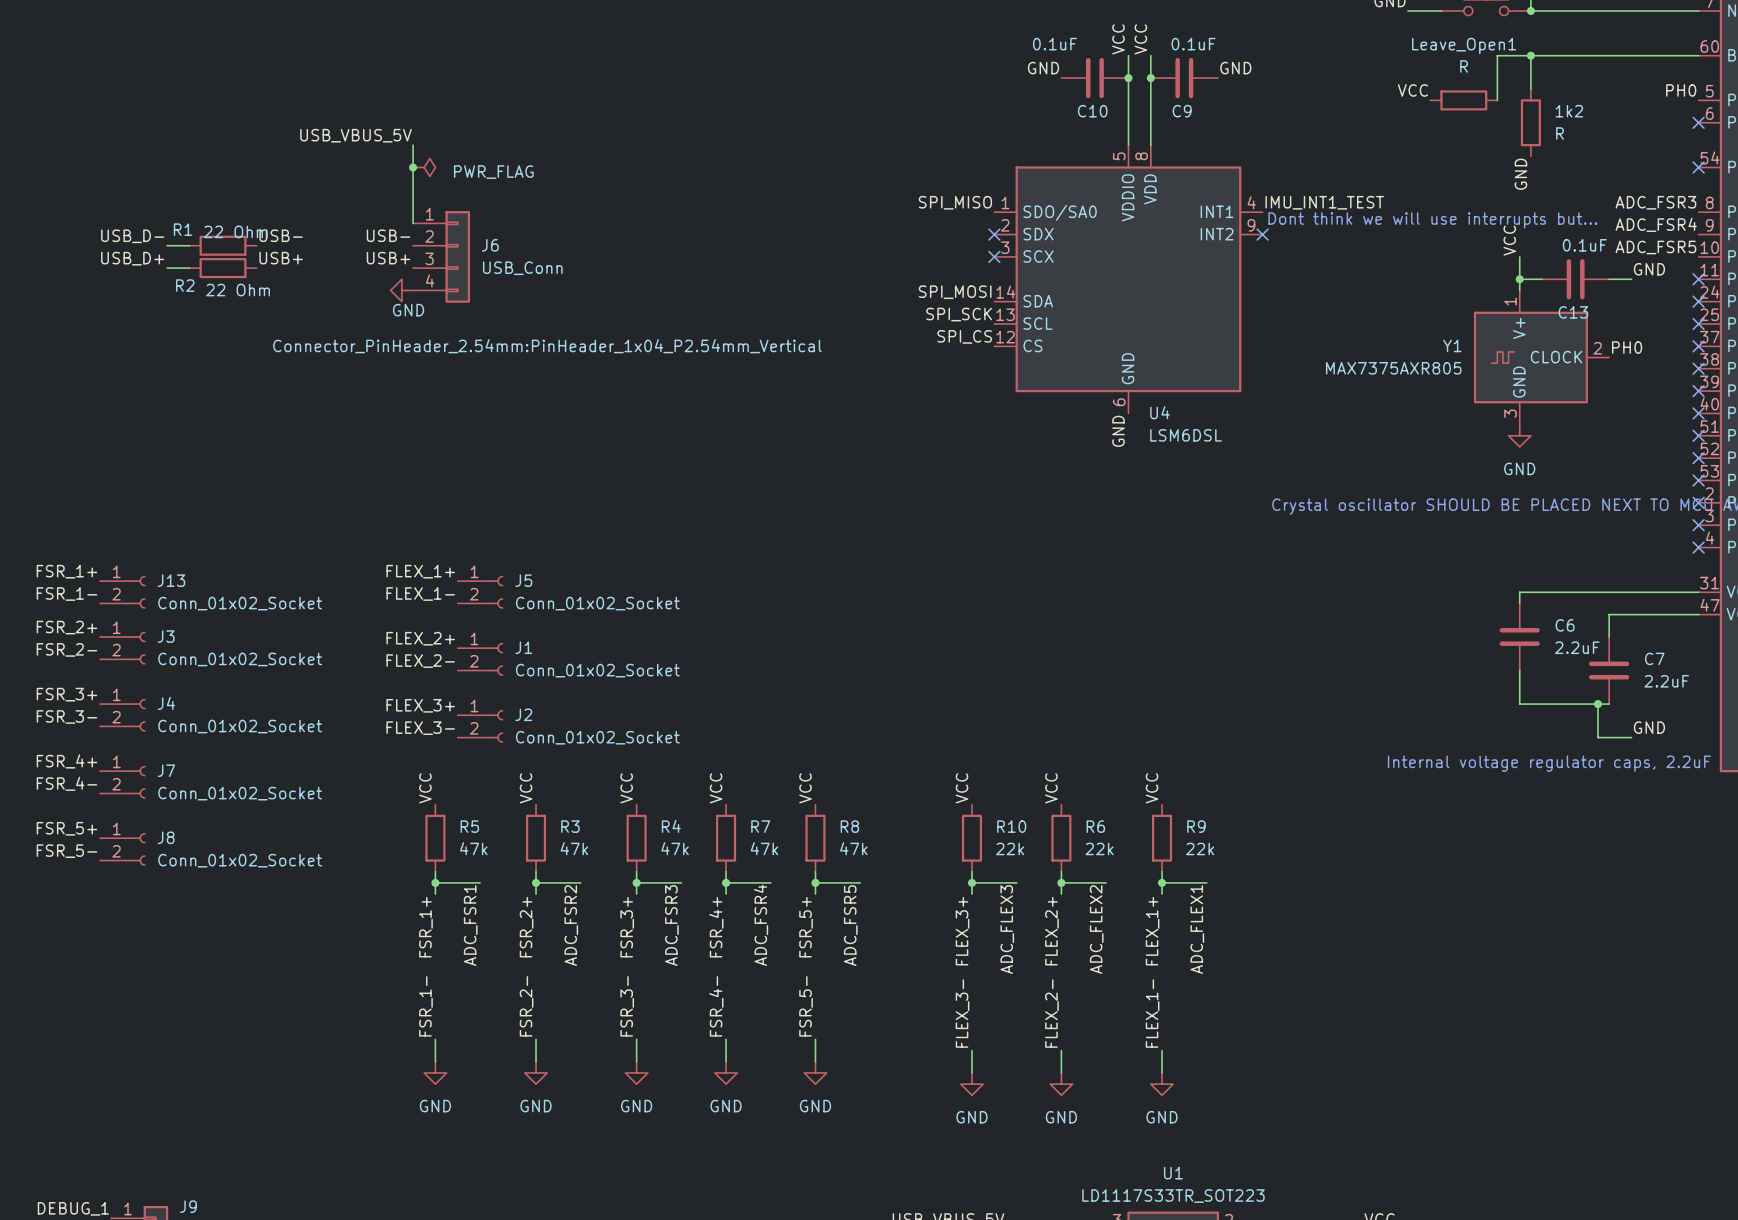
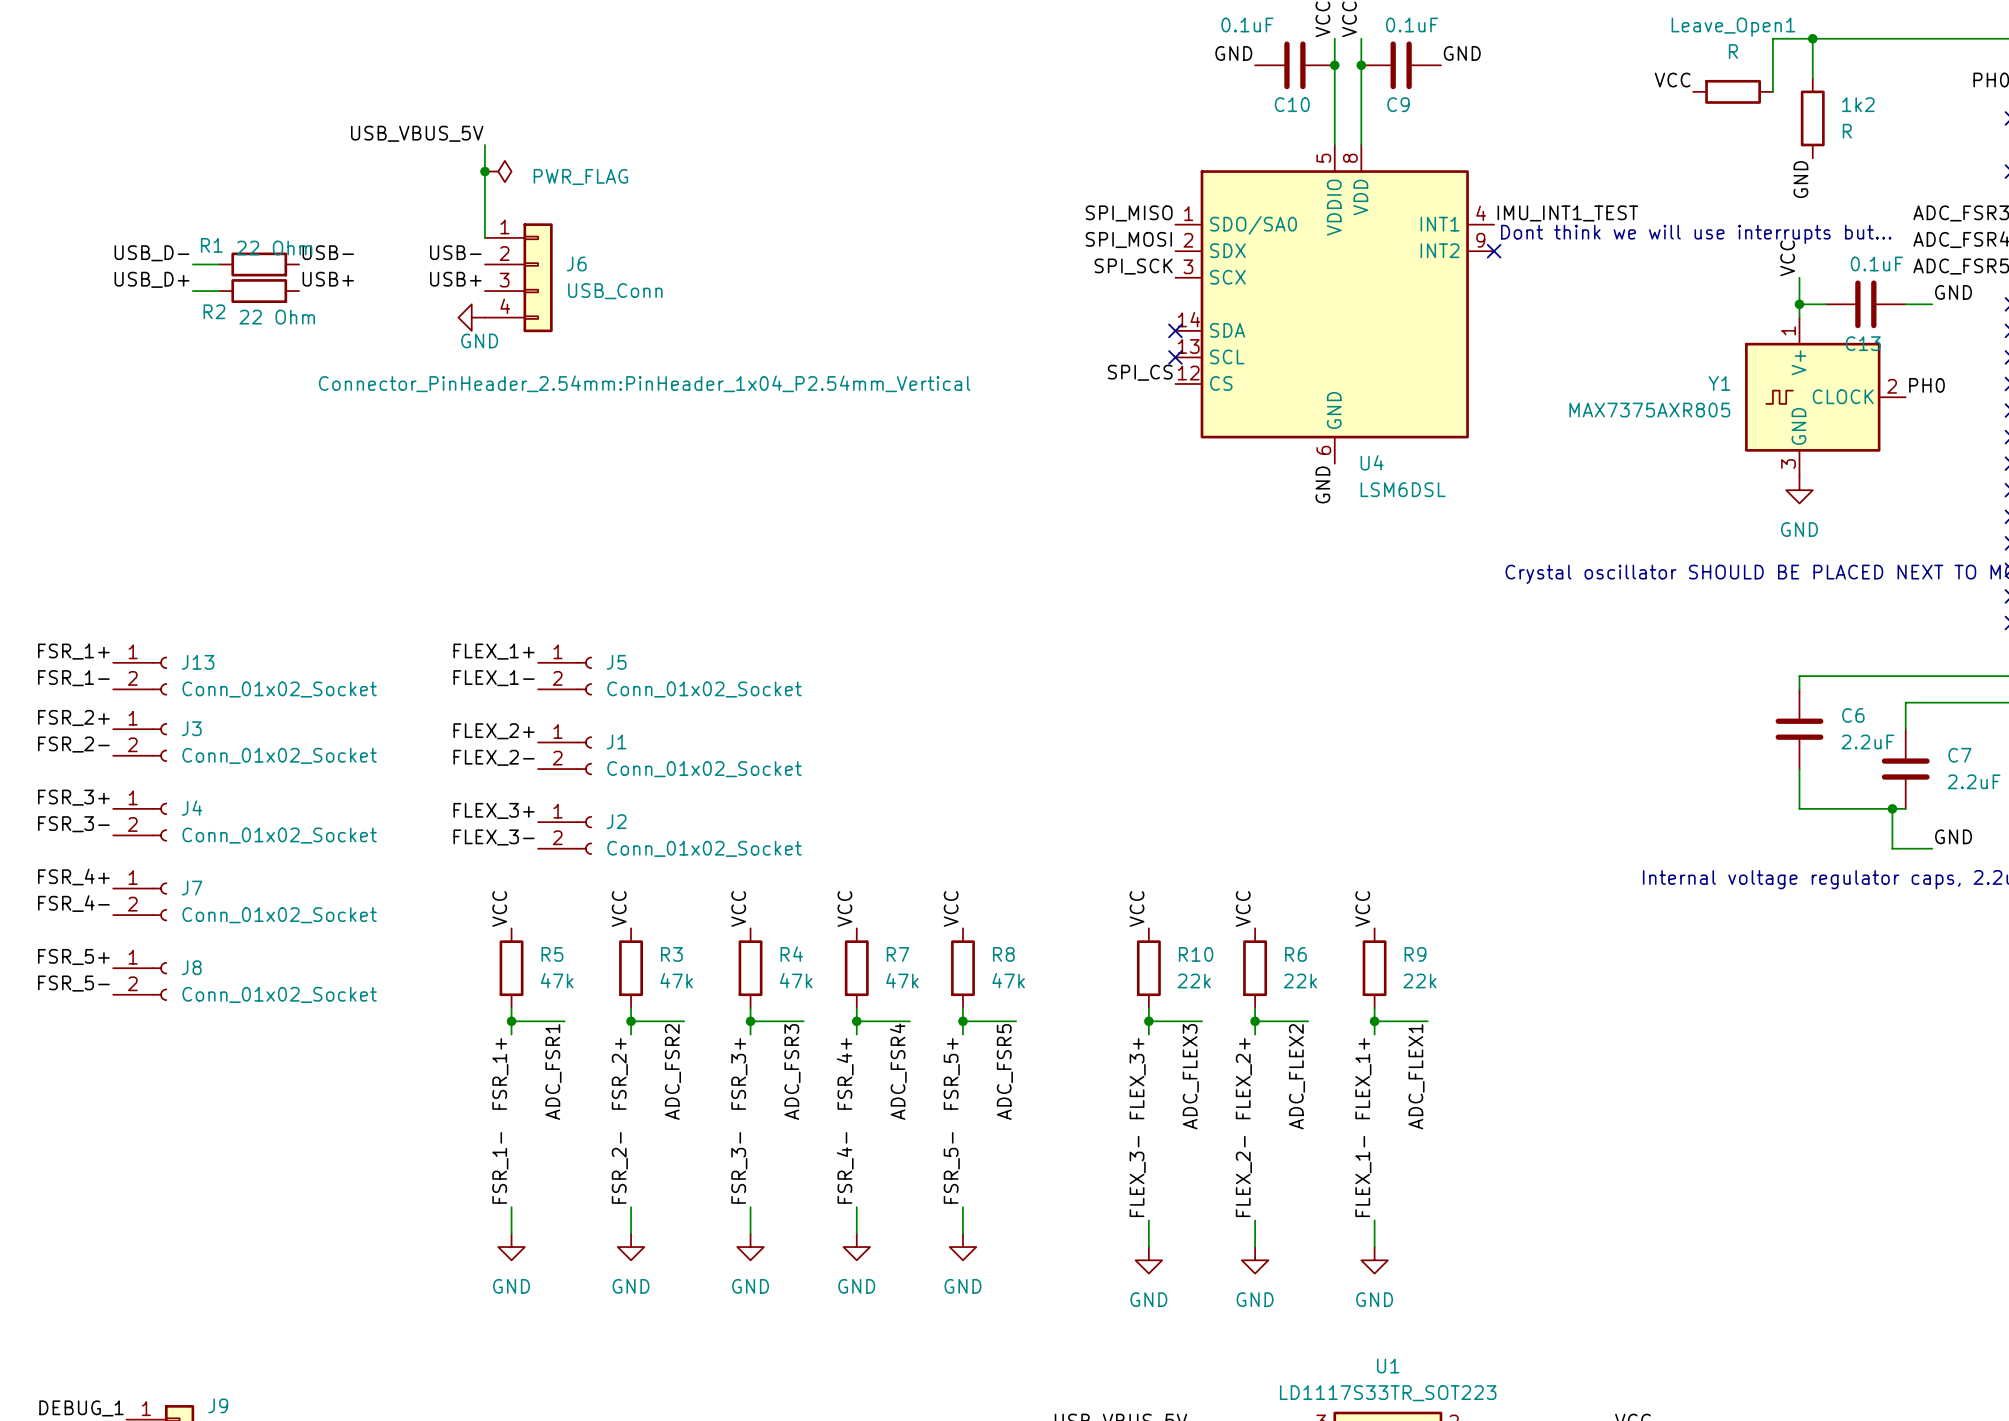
no-connect mark: (994, 234) -> none
no-connect mark: (994, 256) -> none
label position: SPI_MOSI (955, 292) -> SPI_MOSI (1128, 239)
no-connect mark: none -> (1175, 330)
label position: SPI_SCK (959, 314) -> SPI_SCK (1133, 266)
no-connect mark: none -> (1175, 357)

